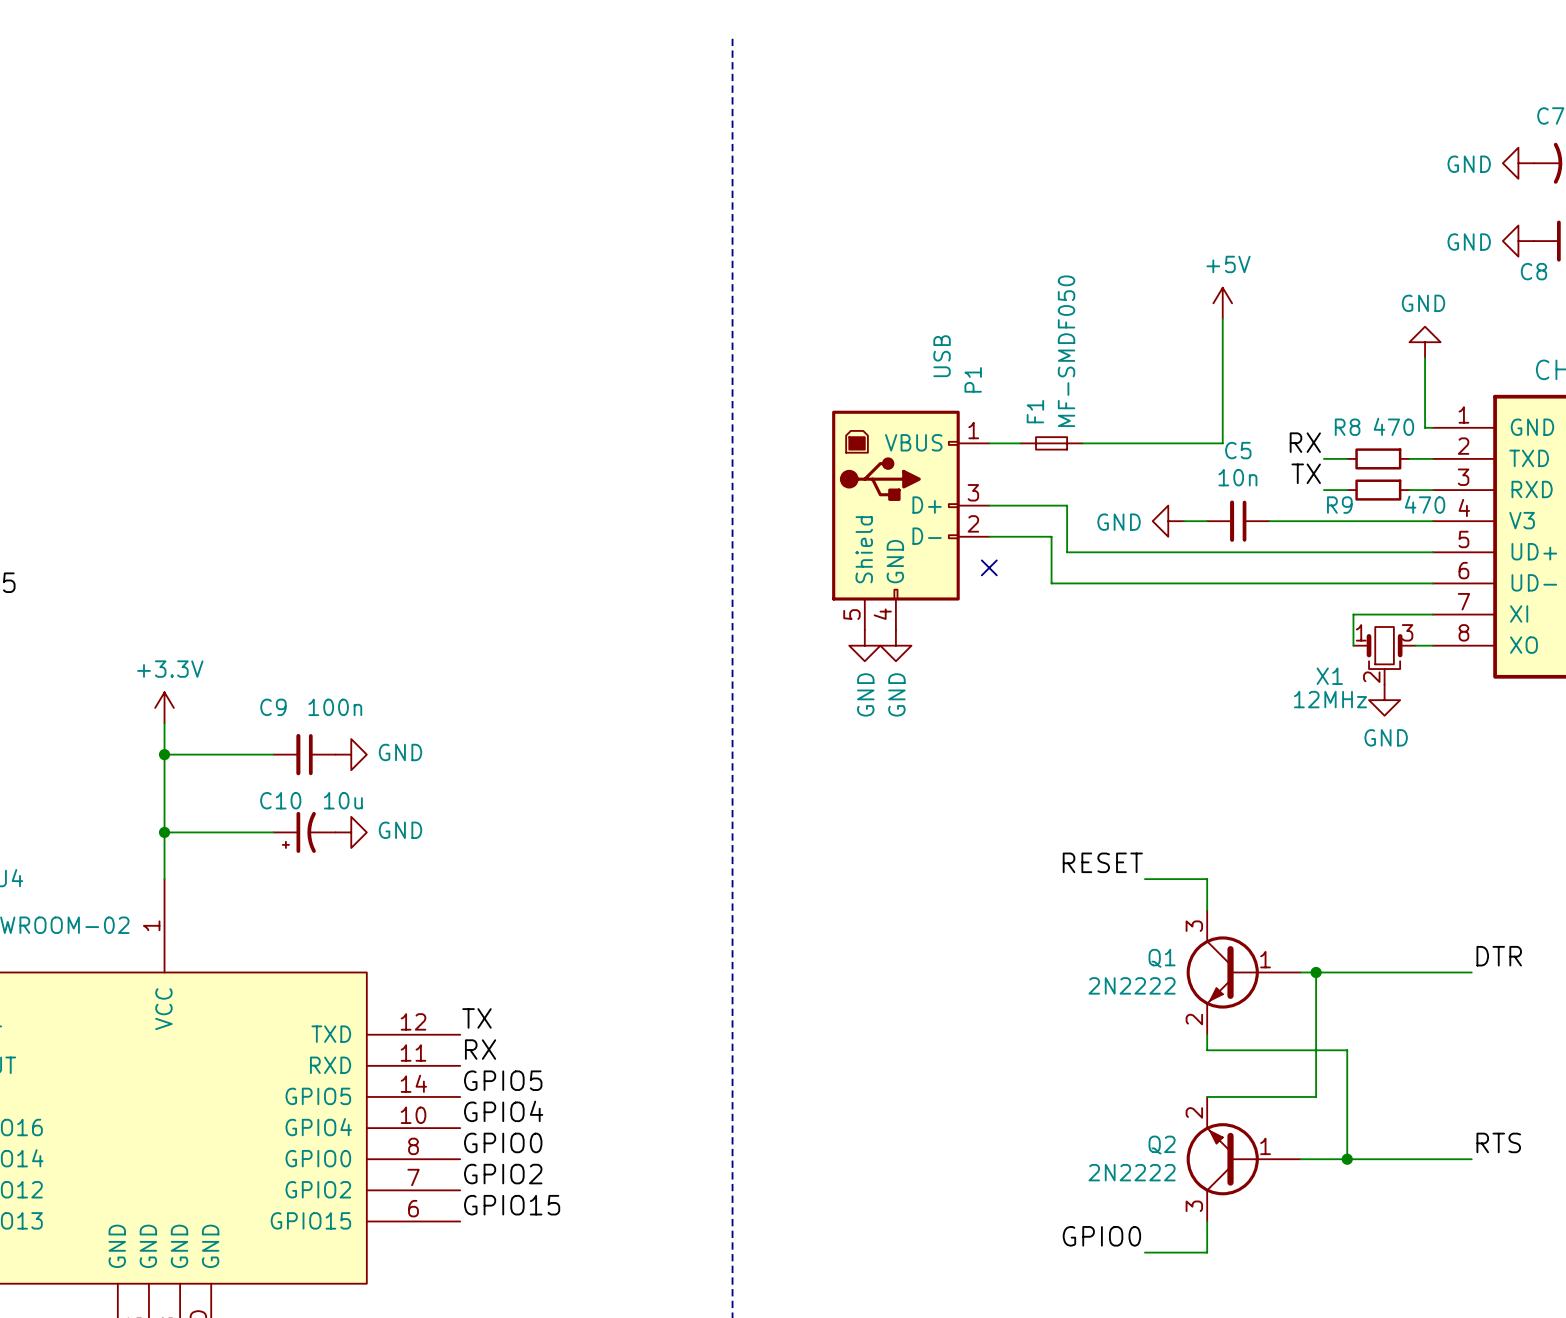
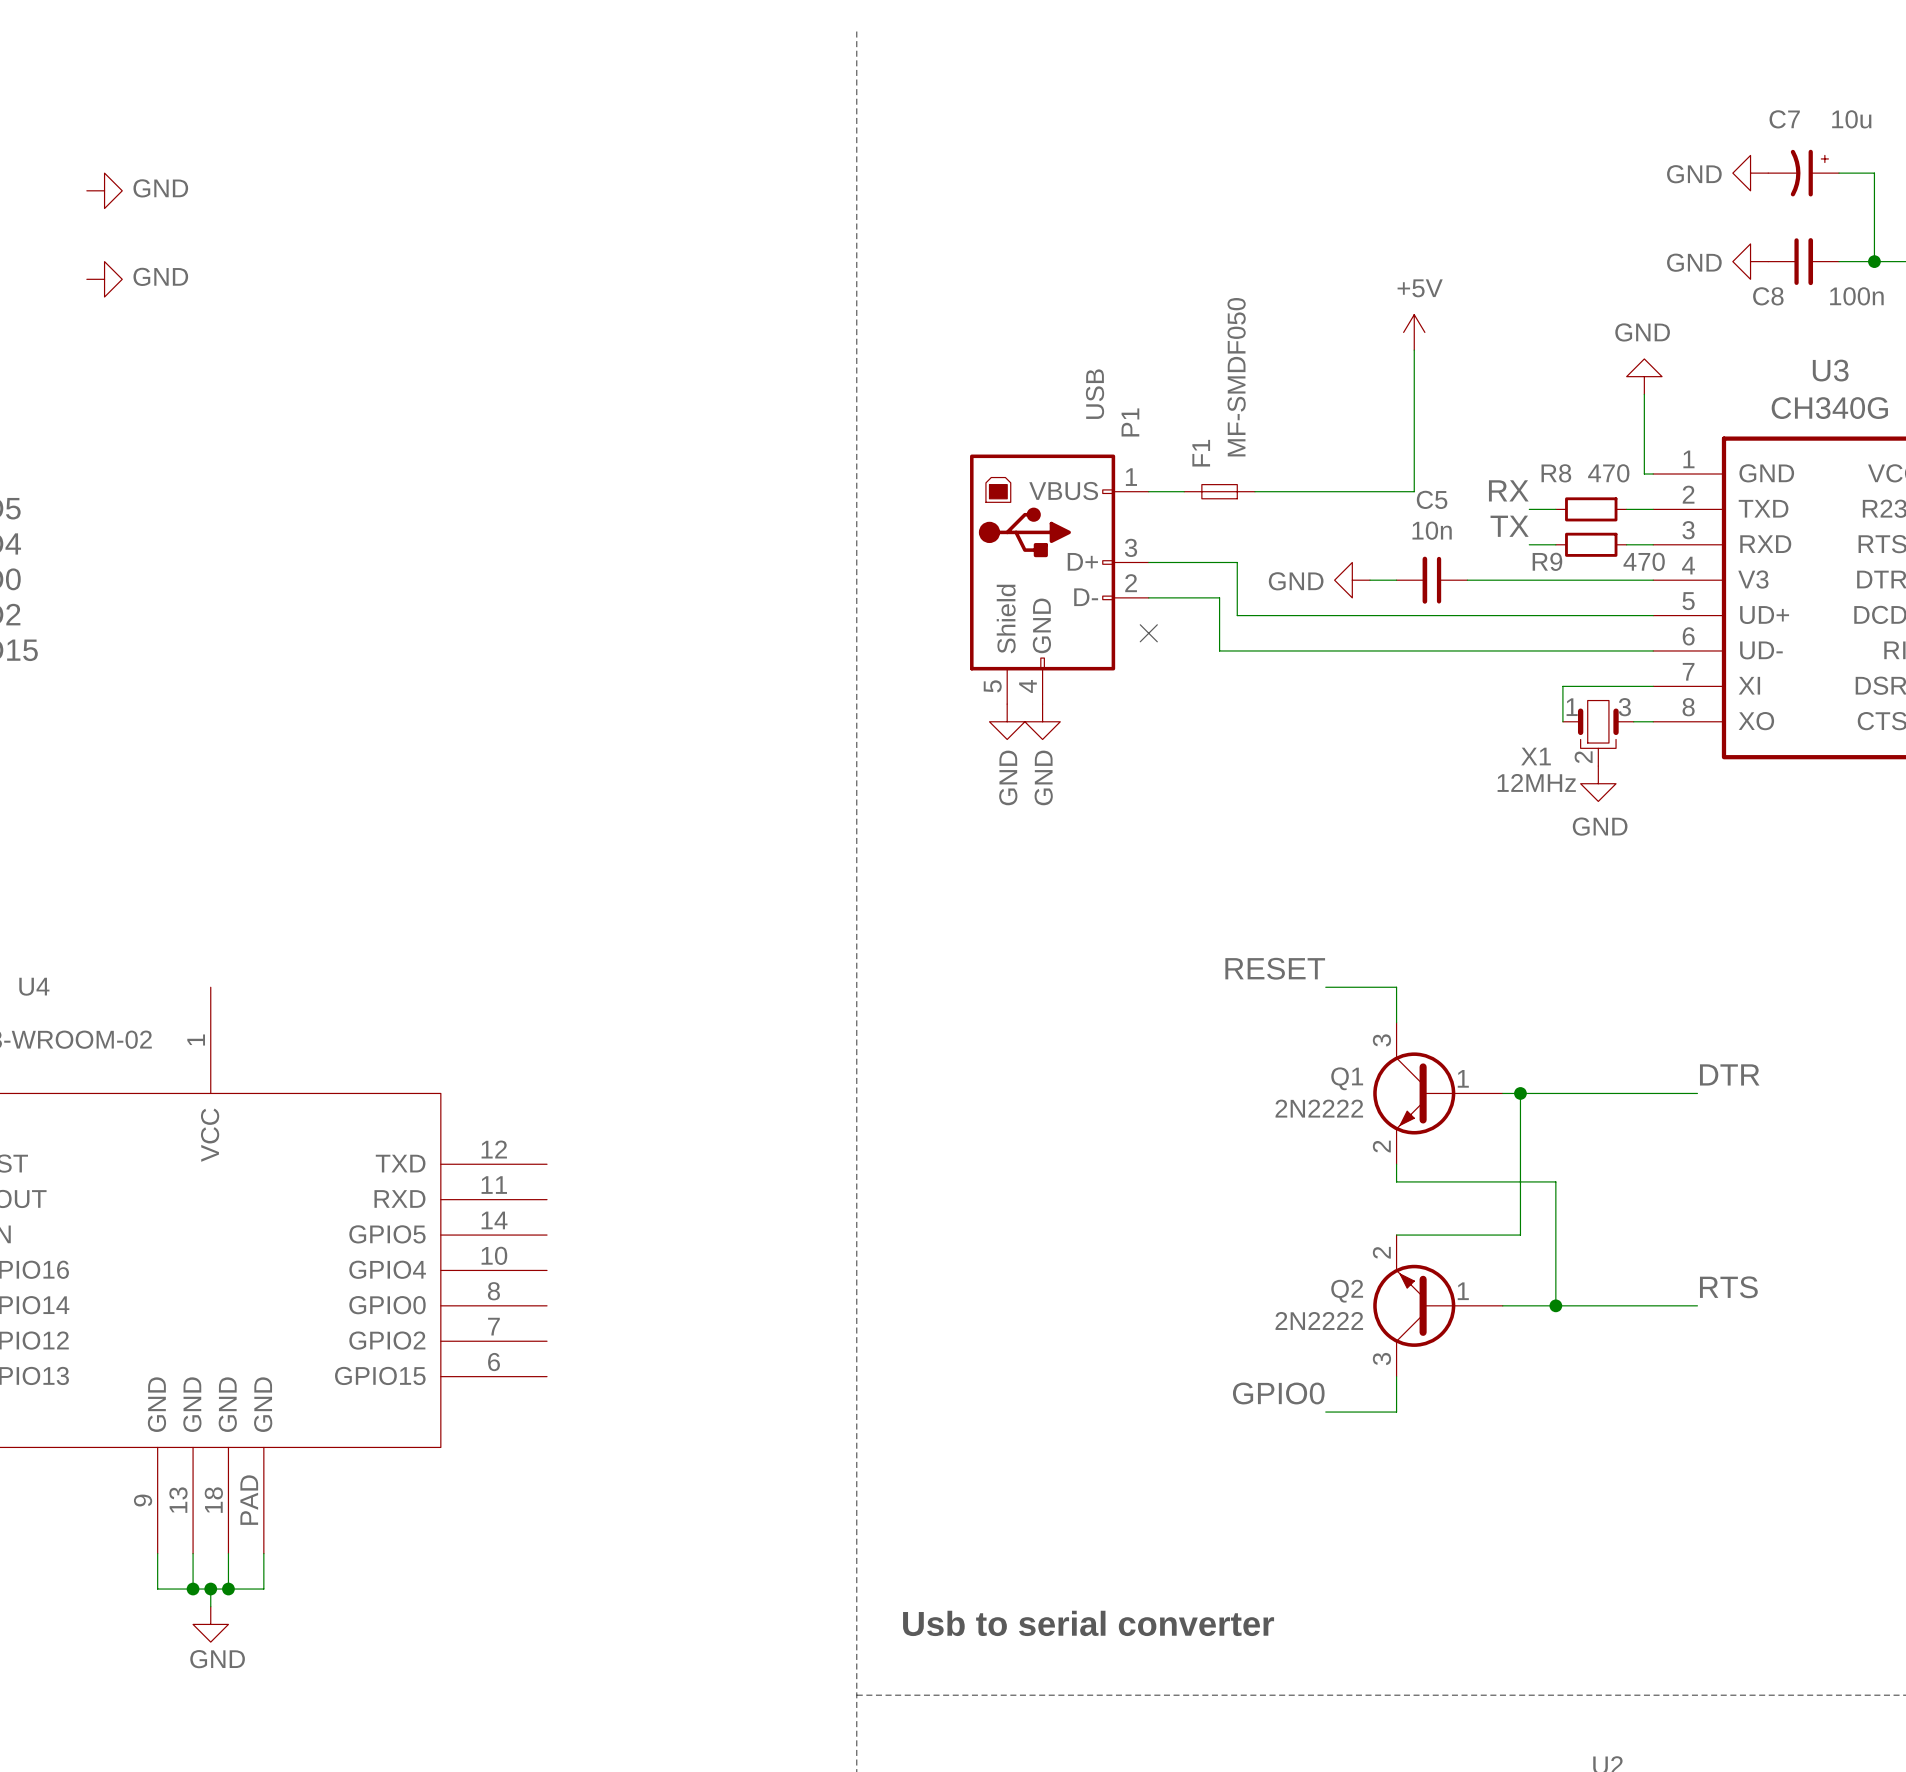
power symbol: none -> GND (104, 190)
power symbol: none -> GND (104, 279)
power symbol: +3.3V (164, 707) -> none
wire: (164, 723) (164, 879) -> none
wire: (164, 754) (273, 754) -> none
junction: (164, 754) -> none
C9: 100n (304, 754) -> none
power symbol: GND (351, 754) -> none
wire: (164, 832) (273, 832) -> none
junction: (164, 832) -> none
C10: 10u (304, 832) -> none
power symbol: GND (351, 832) -> none
label: TX (476, 1018) -> none
label: RX (480, 1049) -> none
label: GPIO5 (503, 1080) -> none
label: GPIO4 (503, 1111) -> none
label: GPIO0 (503, 1142) -> none
label: GPIO2 (503, 1174) -> none
label: GPIO15 (512, 1205) -> none

